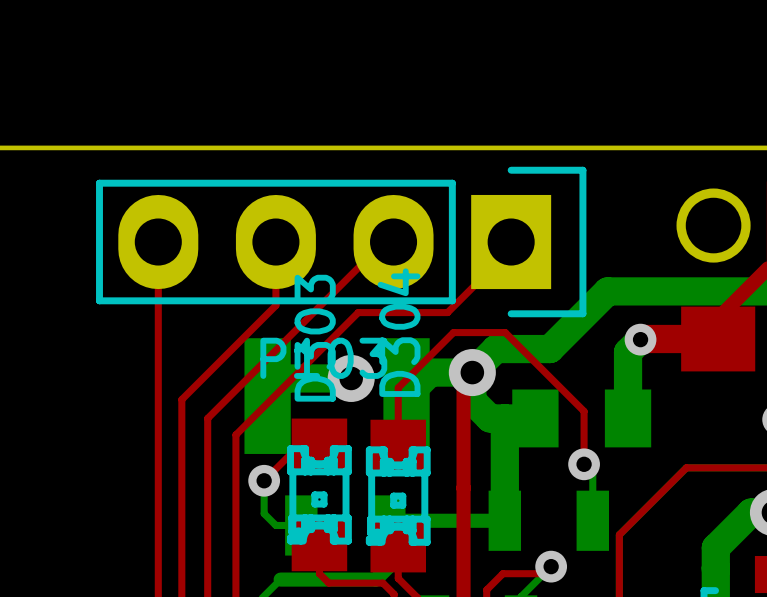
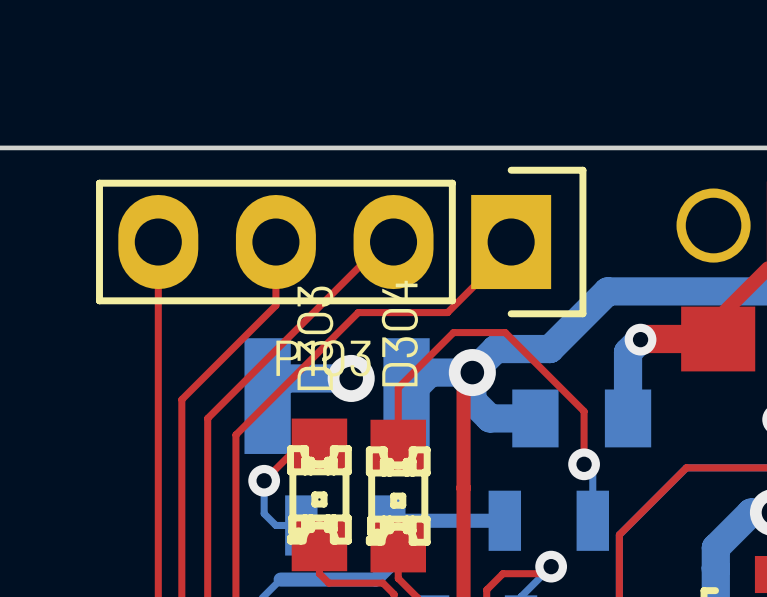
bottom track: (504, 418) (504, 520) -> none

